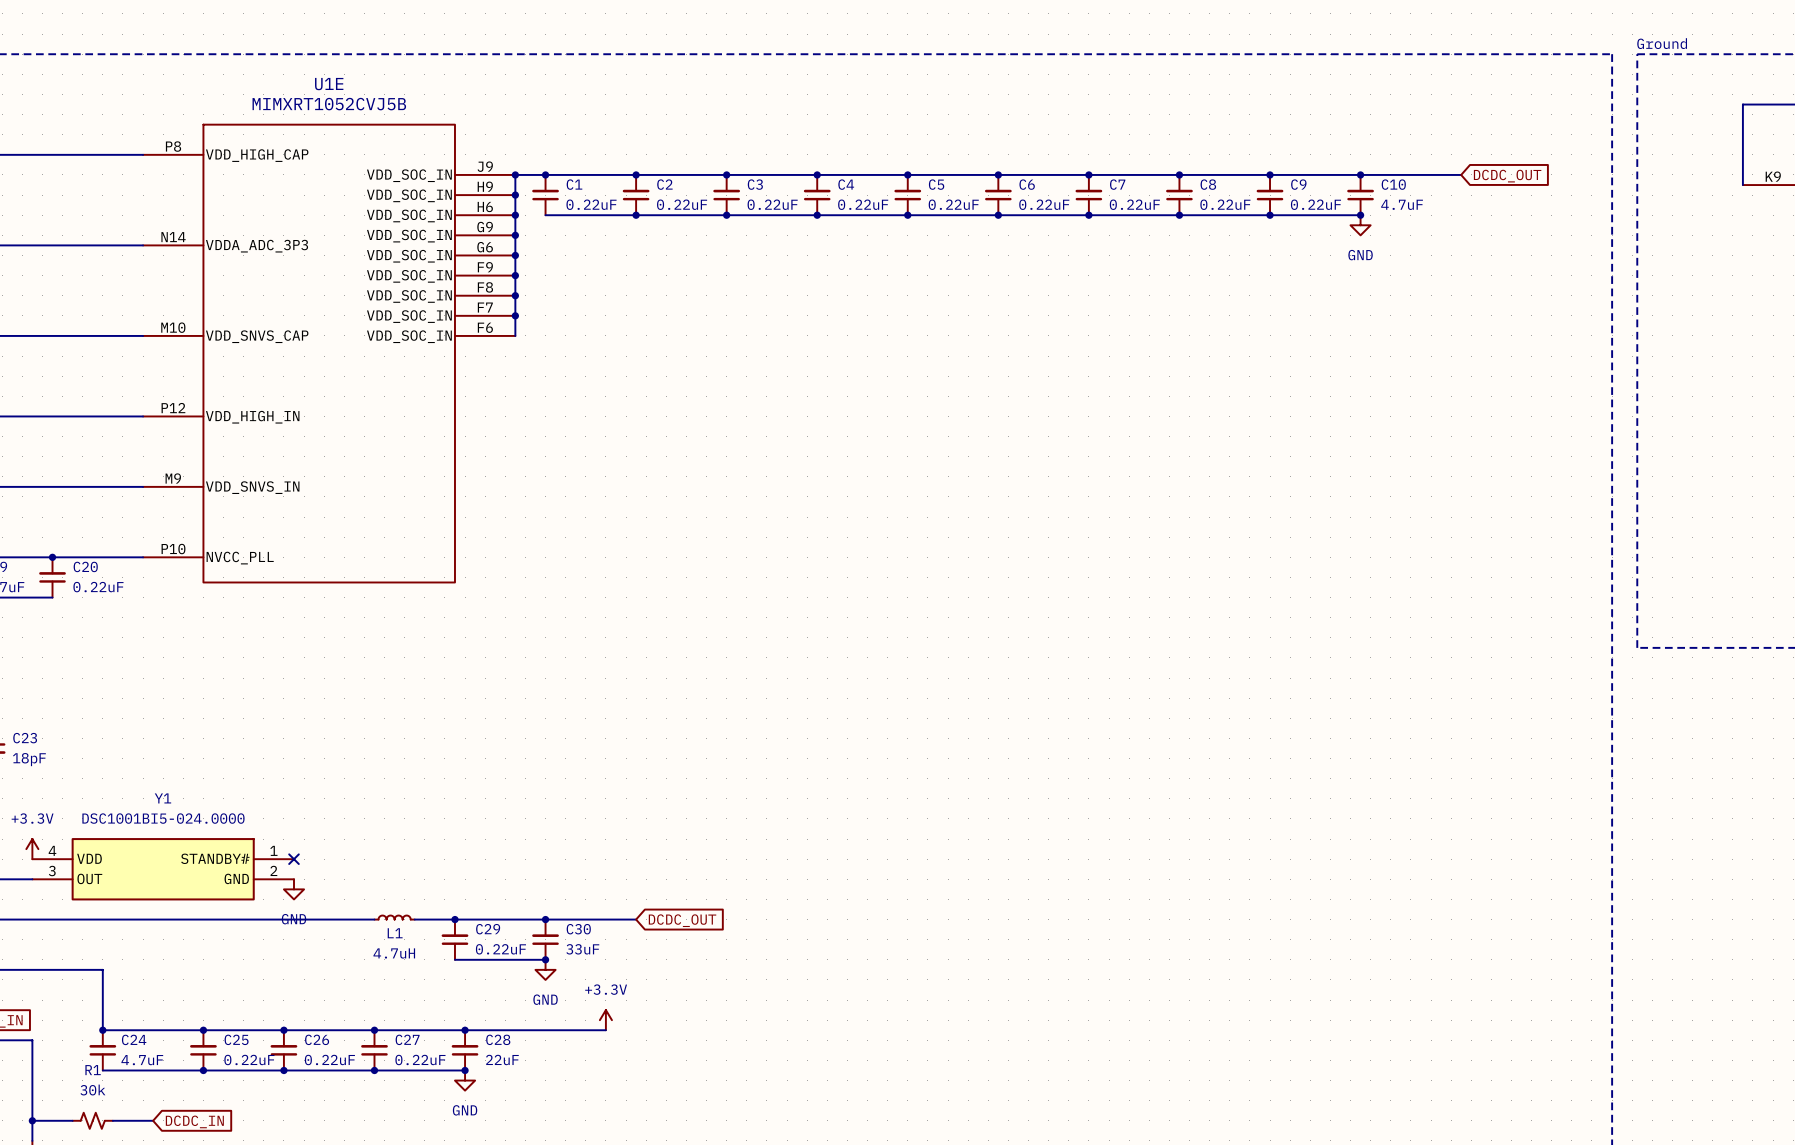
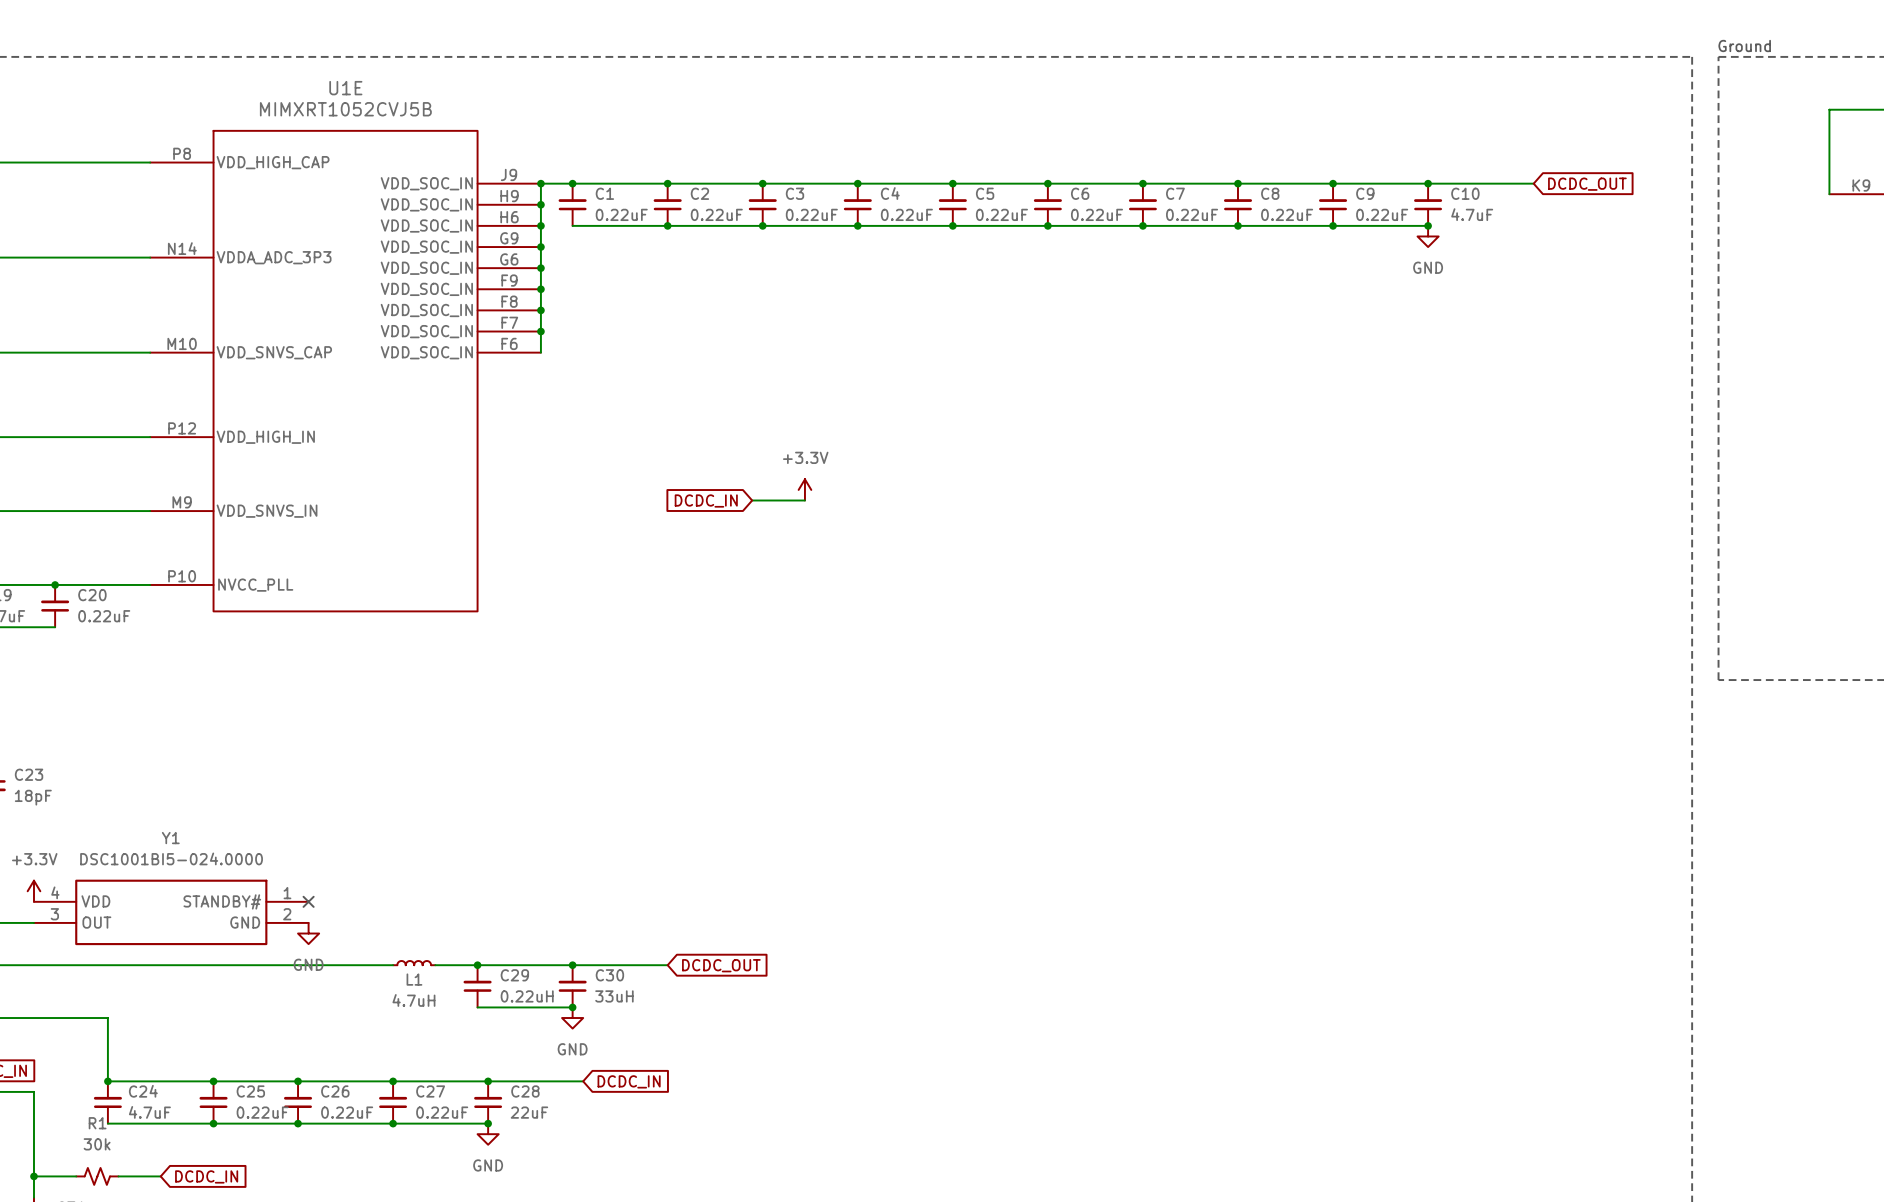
power symbol: none -> +3.3V (804, 489)
wire: none -> (752, 500) (804, 500)
global label: none -> DCDC_IN (706, 501)
C29 value: 0.22uF (500, 949) -> 0.22uH (527, 996)
C30 value: 33uF (582, 949) -> 33uH (614, 996)
power symbol: +3.3V (605, 1020) -> none
wire: (555, 1030) (605, 1030) -> none
global label: none -> DCDC_IN (629, 1081)

